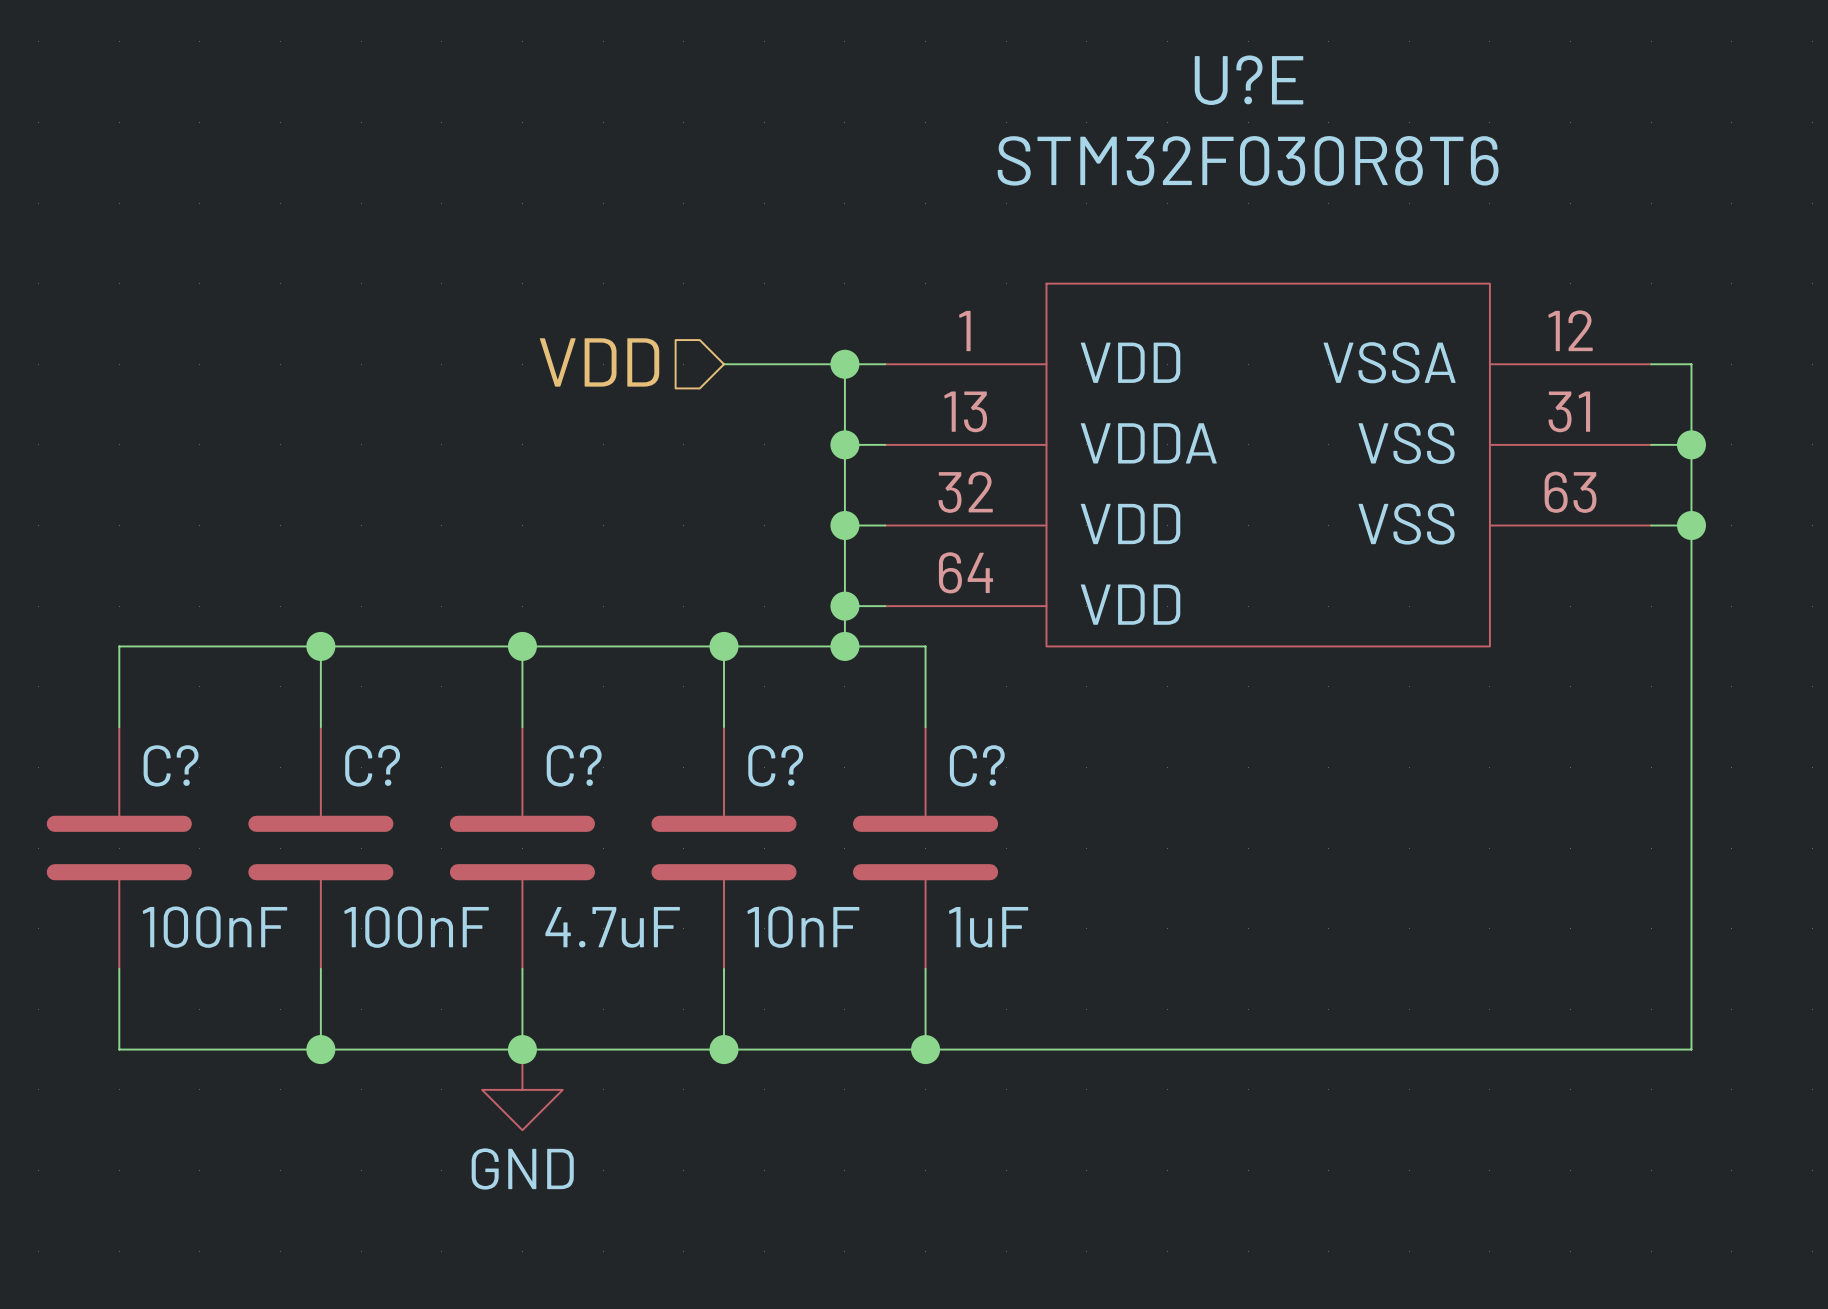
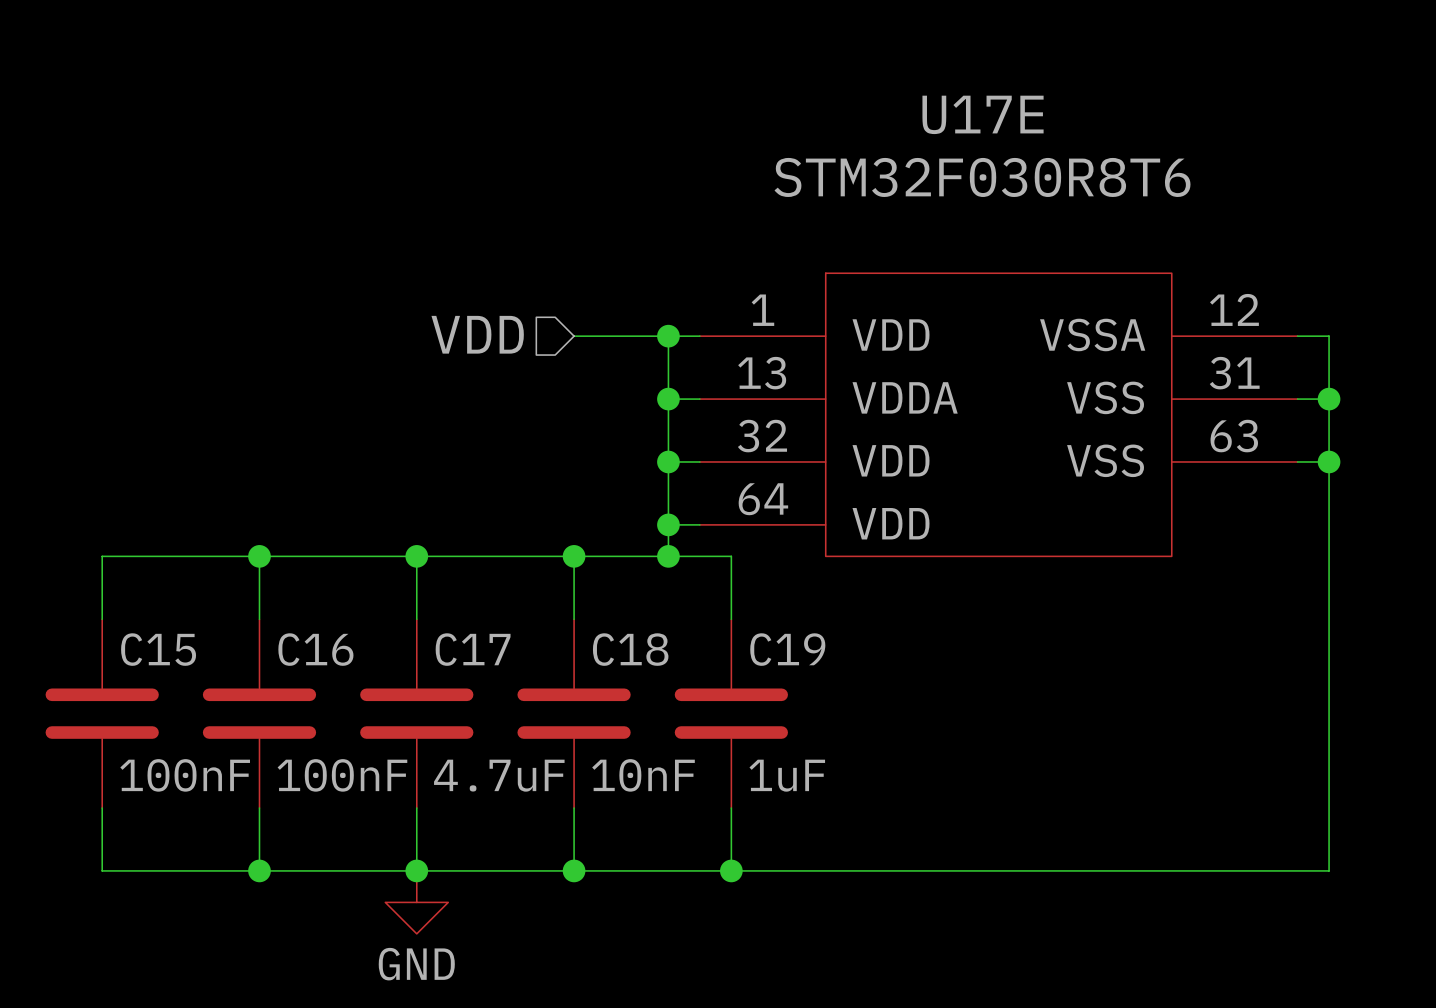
U?E name: U?E (1249, 80) -> U17E (983, 114)
C? name: C? (171, 765) -> C15 (158, 649)
C? name: C? (372, 765) -> C16 (315, 649)
C? name: C? (574, 765) -> C17 (473, 649)
C? name: C? (775, 765) -> C18 (630, 649)
C? name: C? (977, 765) -> C19 (787, 649)

